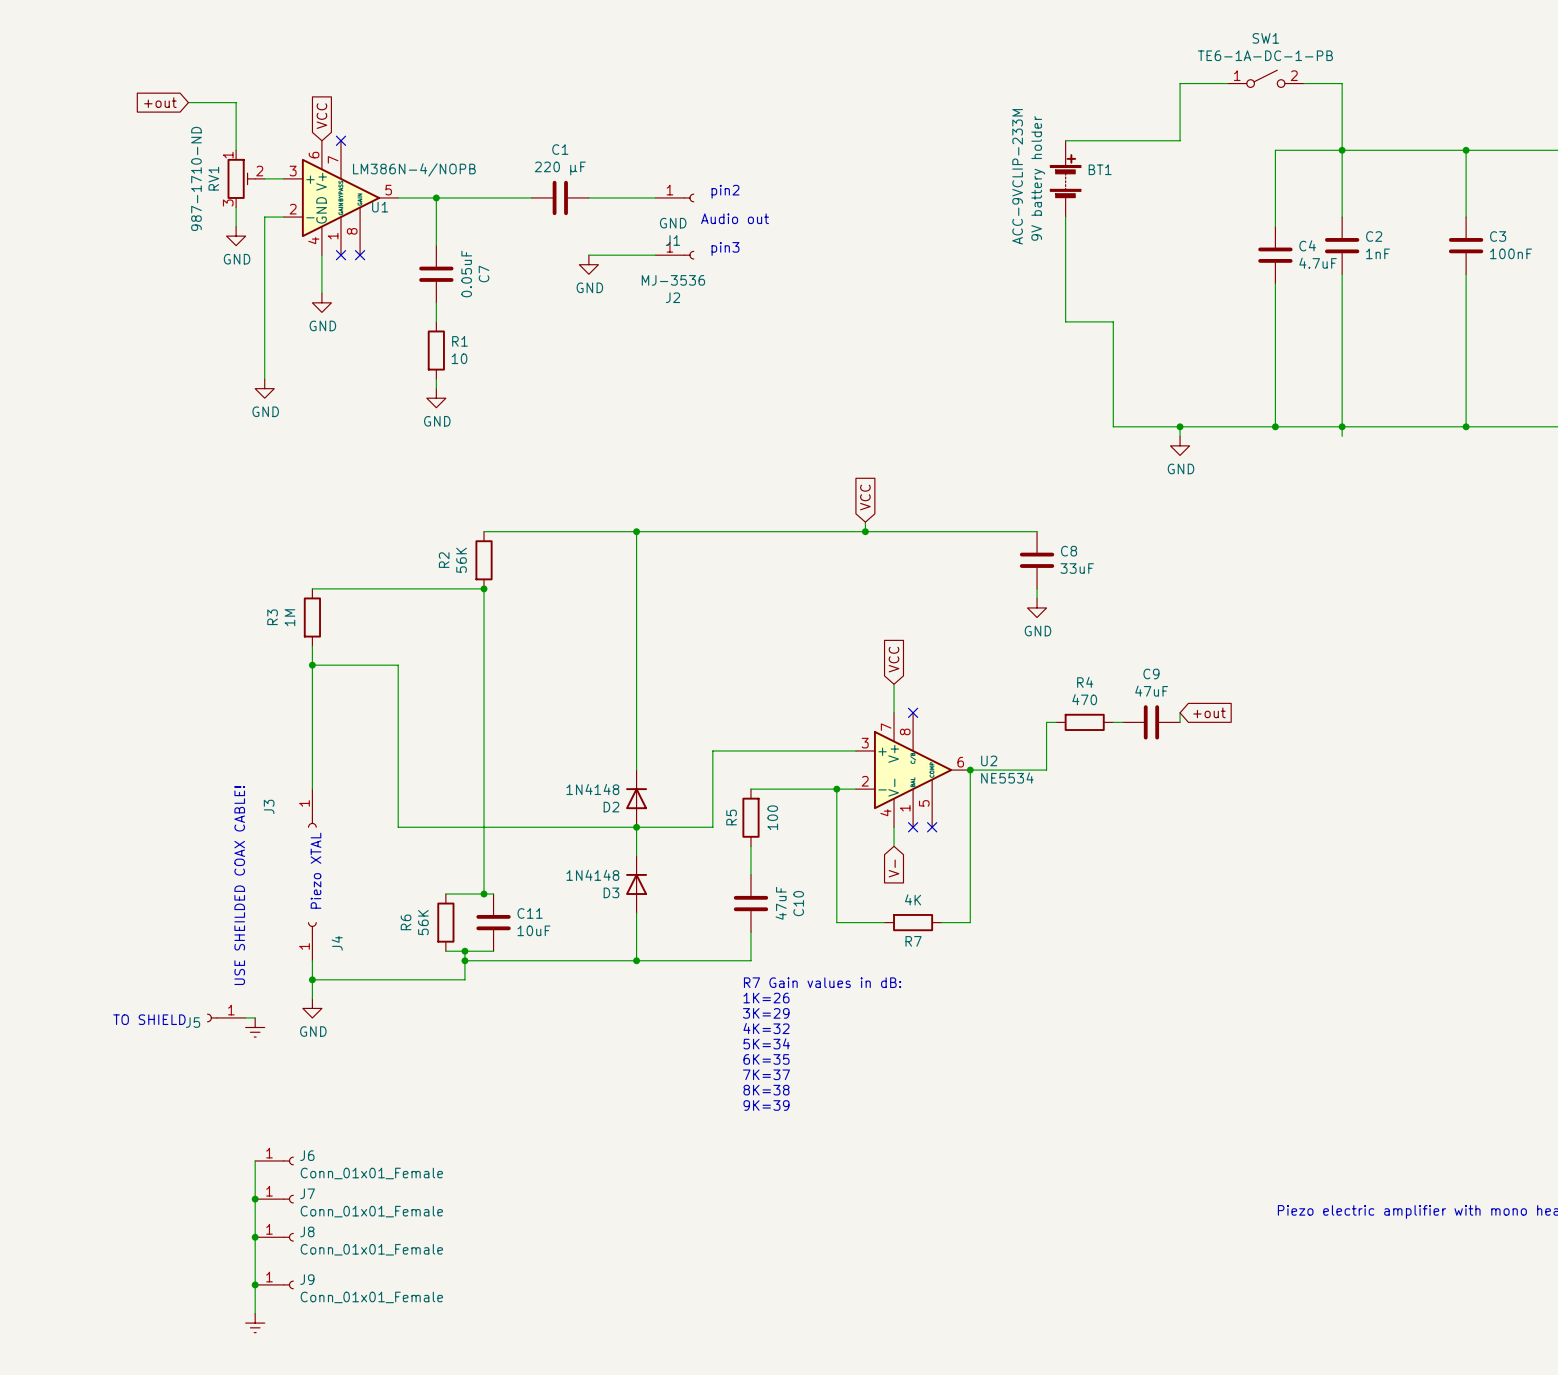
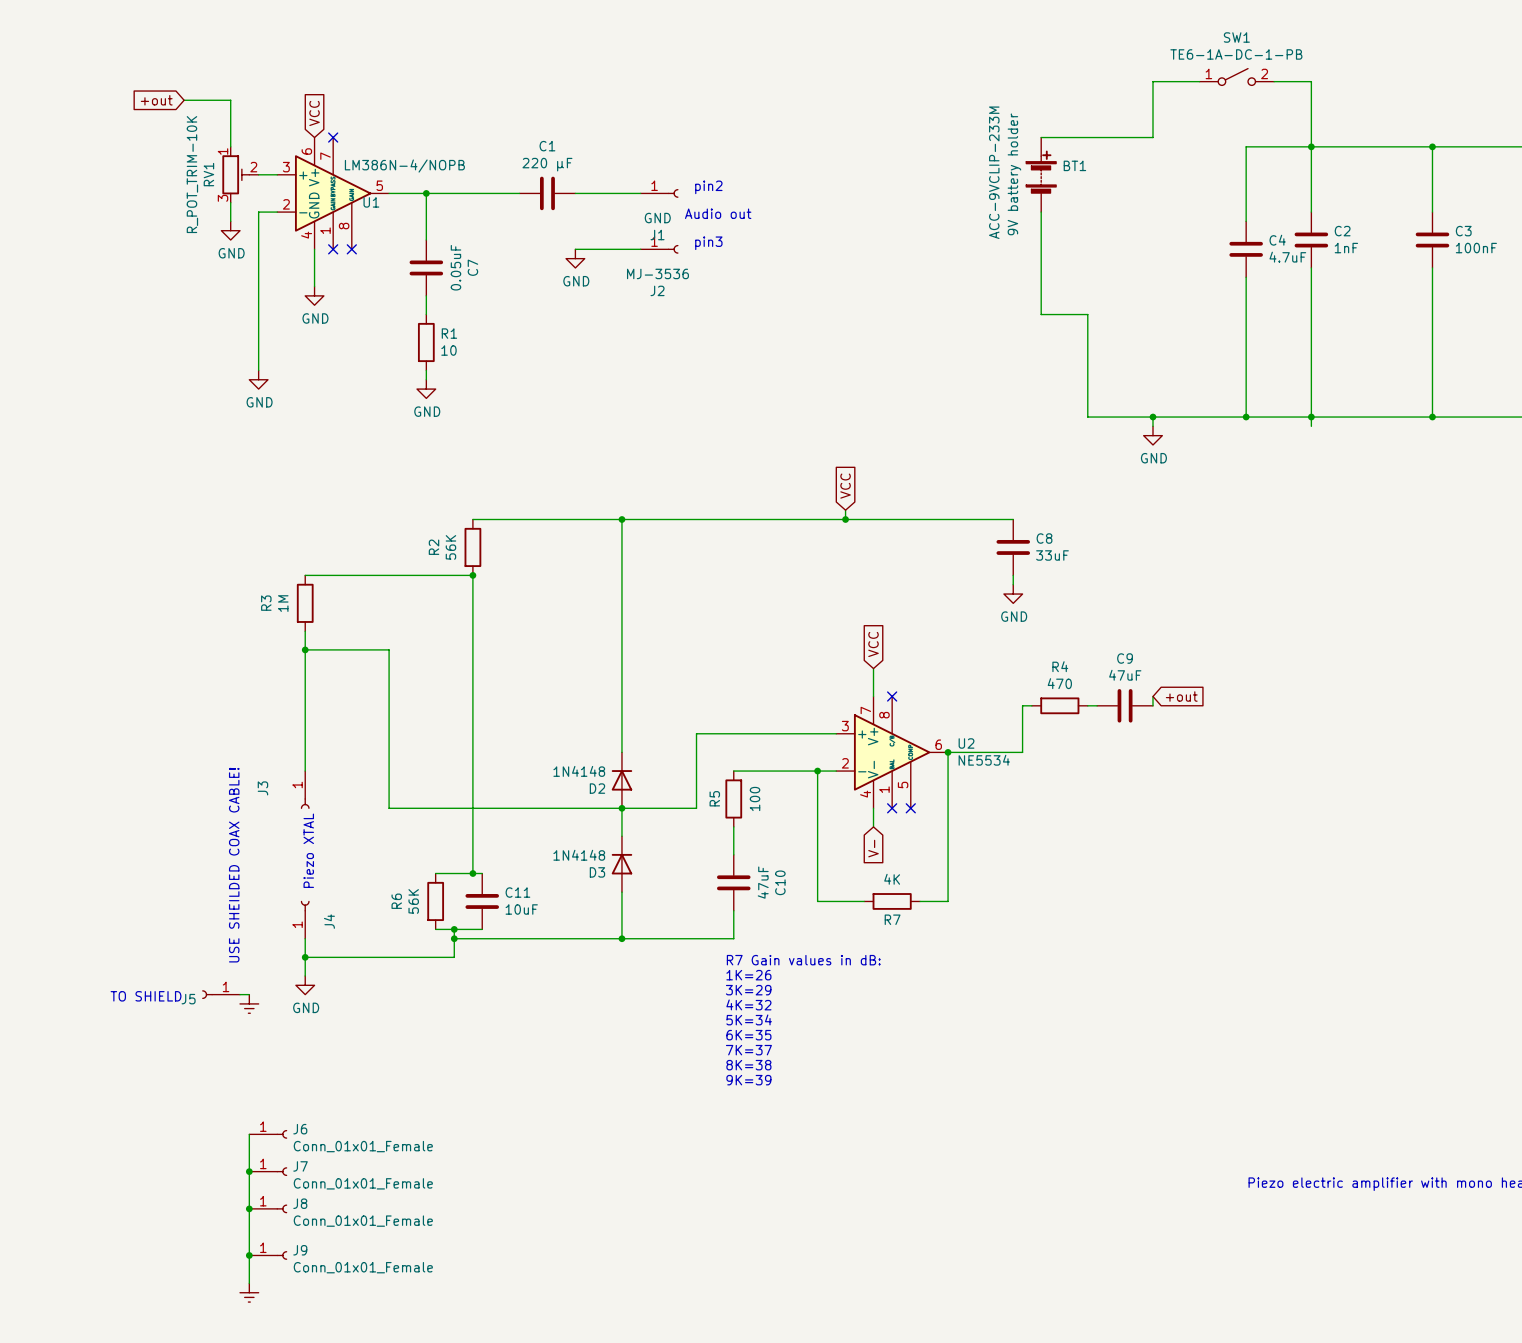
RV1 value: 987-1710-ND (196, 178) -> R_POT_TRIM-10K (192, 174)

